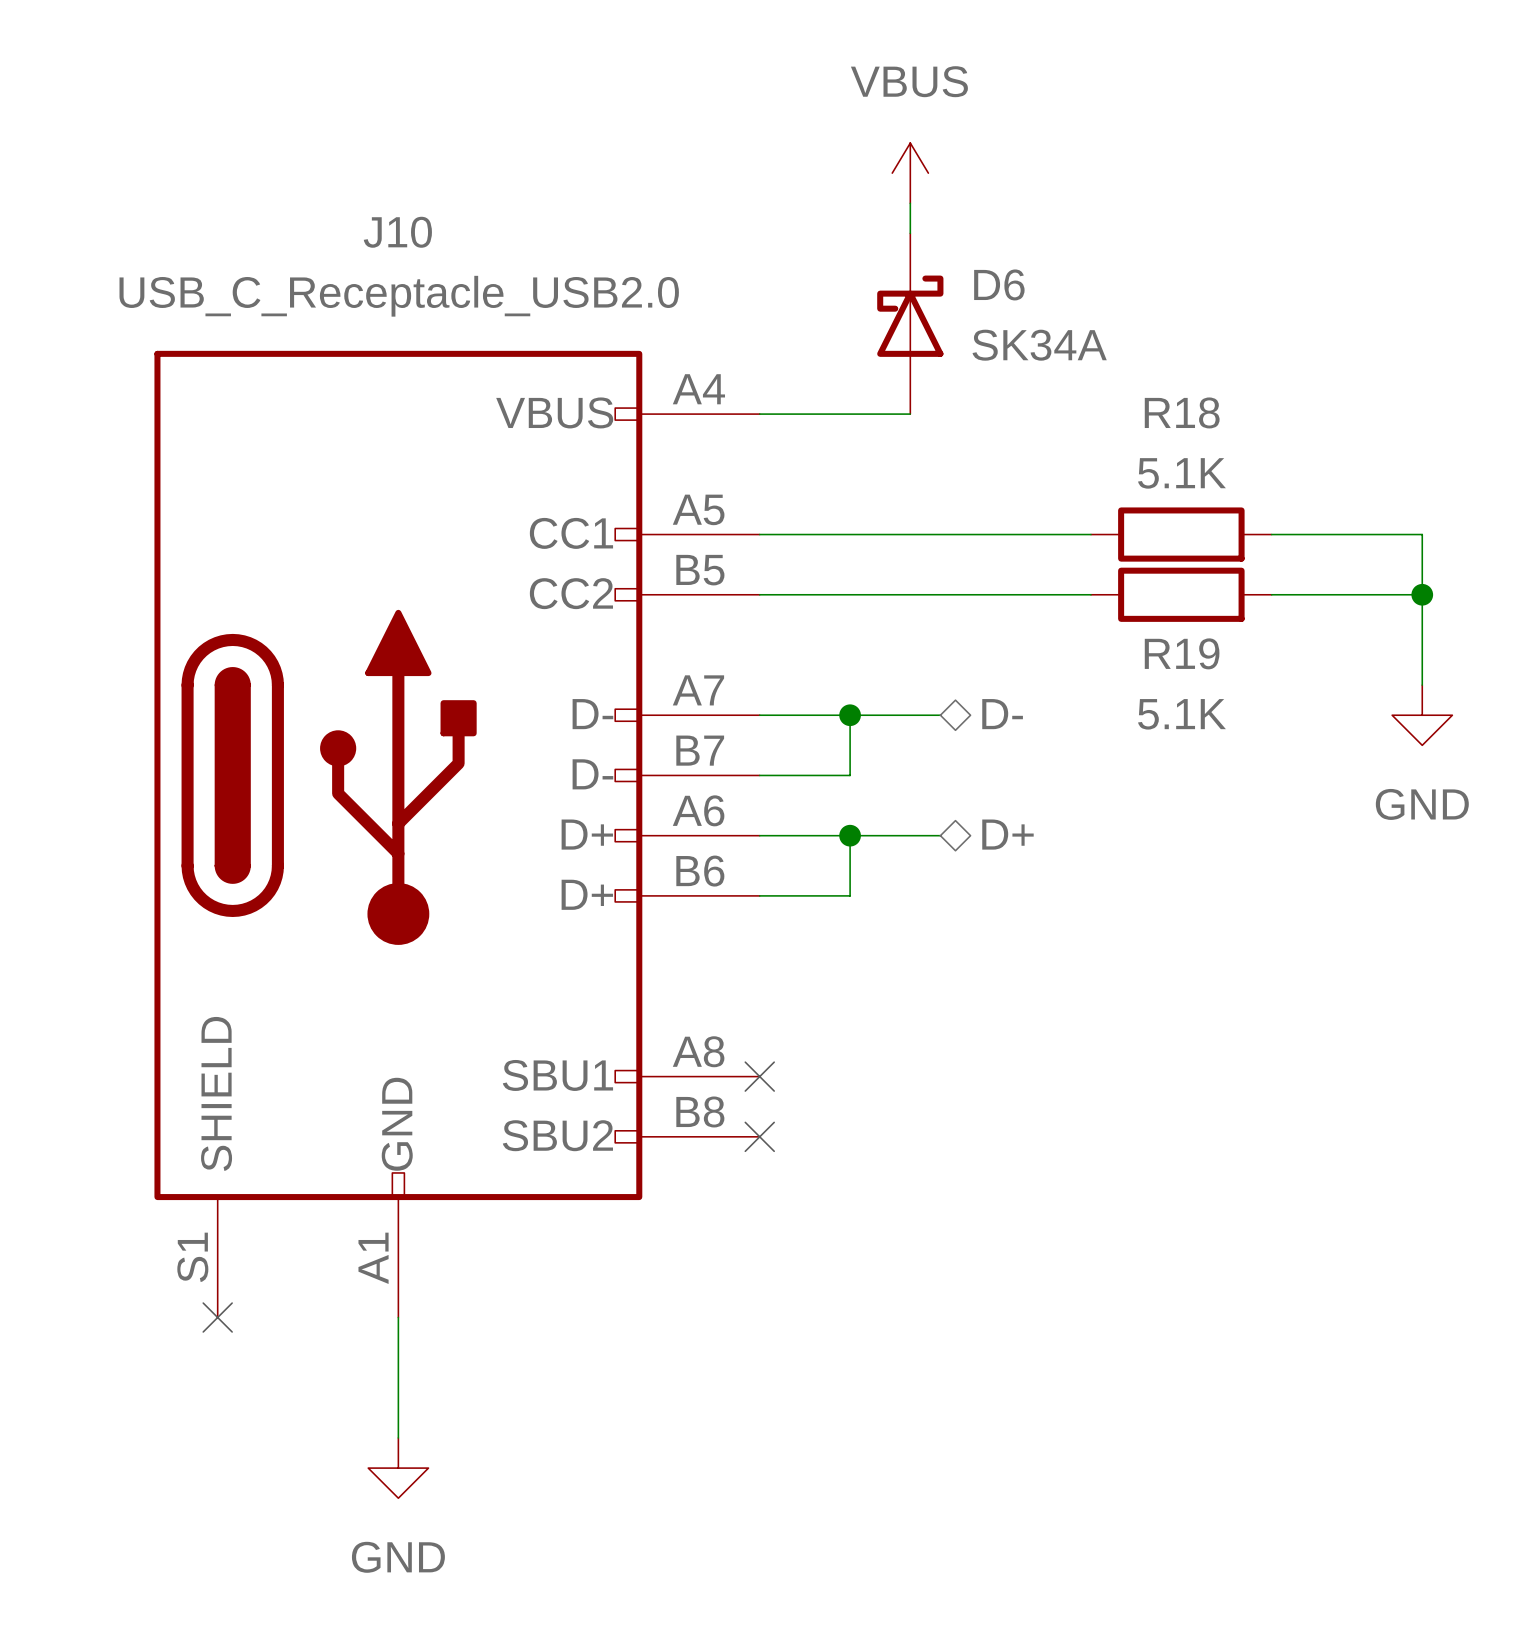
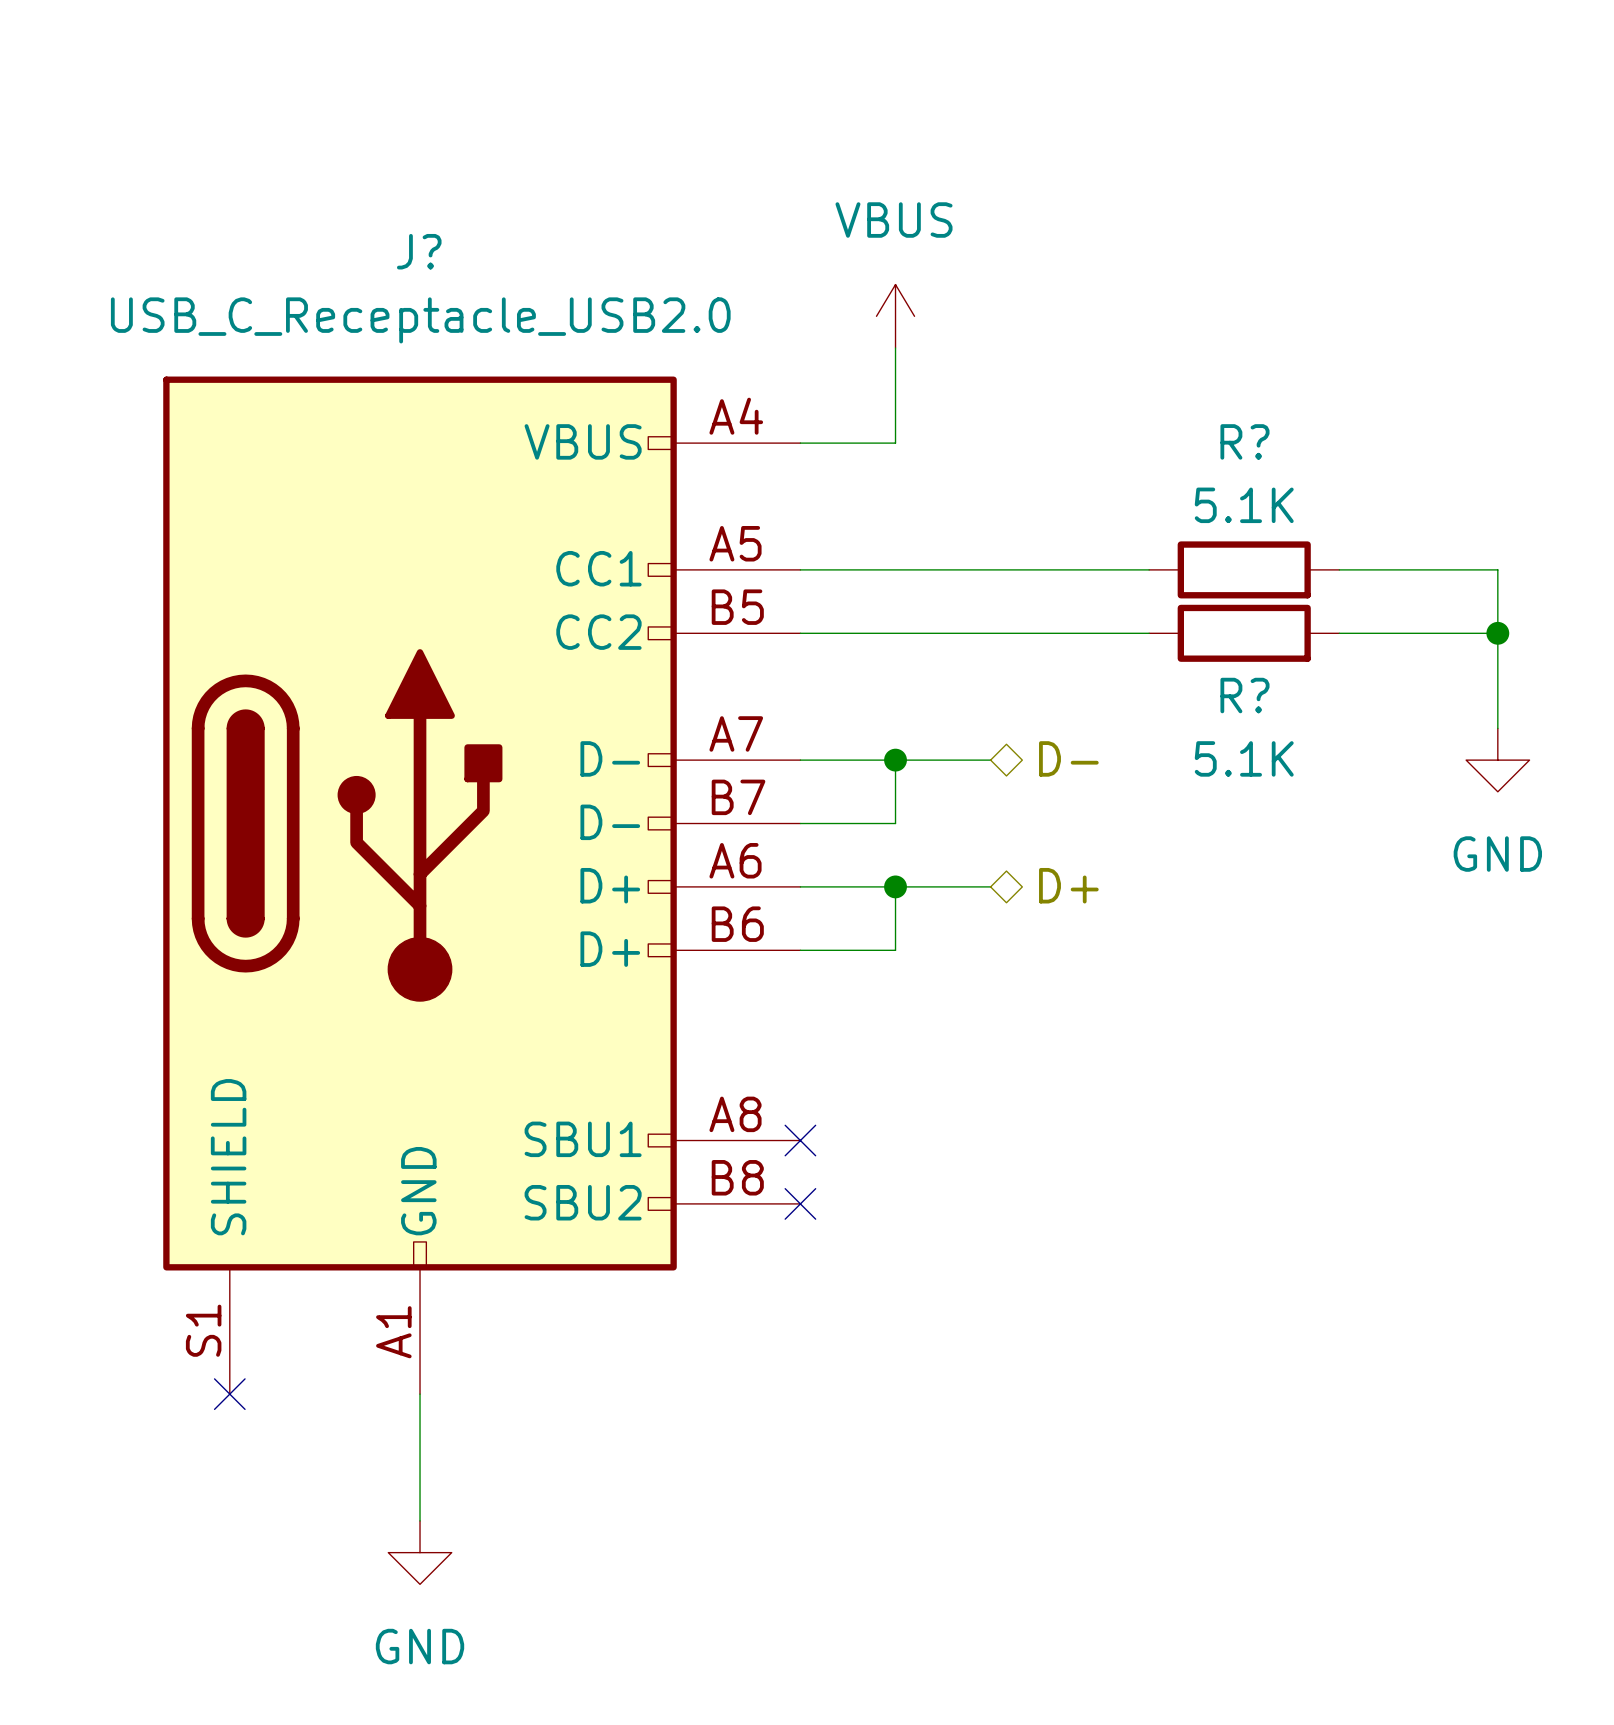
power symbol position: VBUS (910, 173) -> VBUS (895, 316)
wire: (910, 203) (910, 233) -> none
J10 name: J10 (397, 232) -> J? (419, 251)
D6: SK34A (910, 323) -> none
R18 name: R18 (1182, 412) -> R? (1244, 441)
wire: (850, 414) (910, 414) -> (895, 443) (895, 348)
R19 name: R19 (1182, 653) -> R? (1244, 695)

